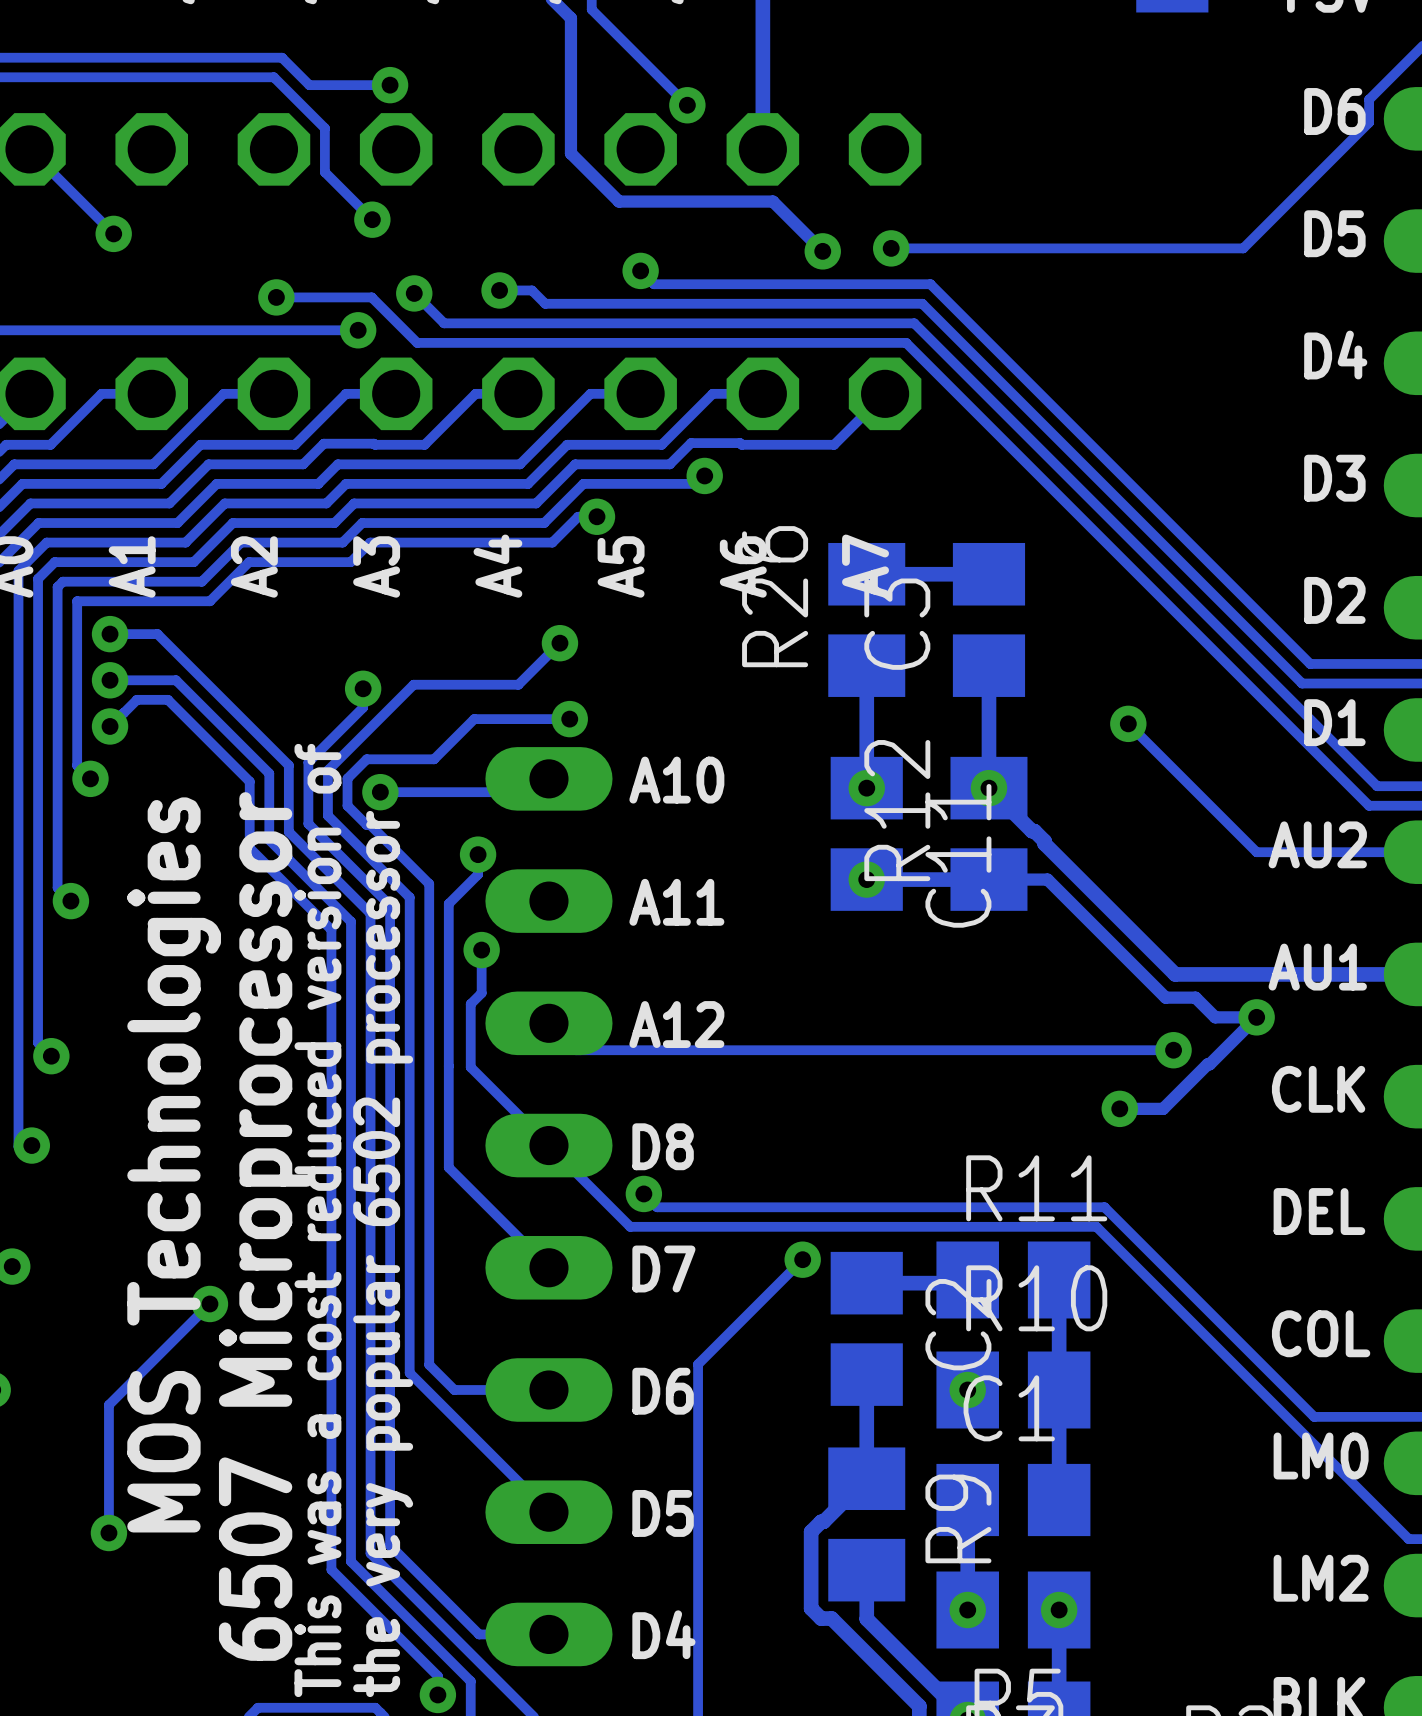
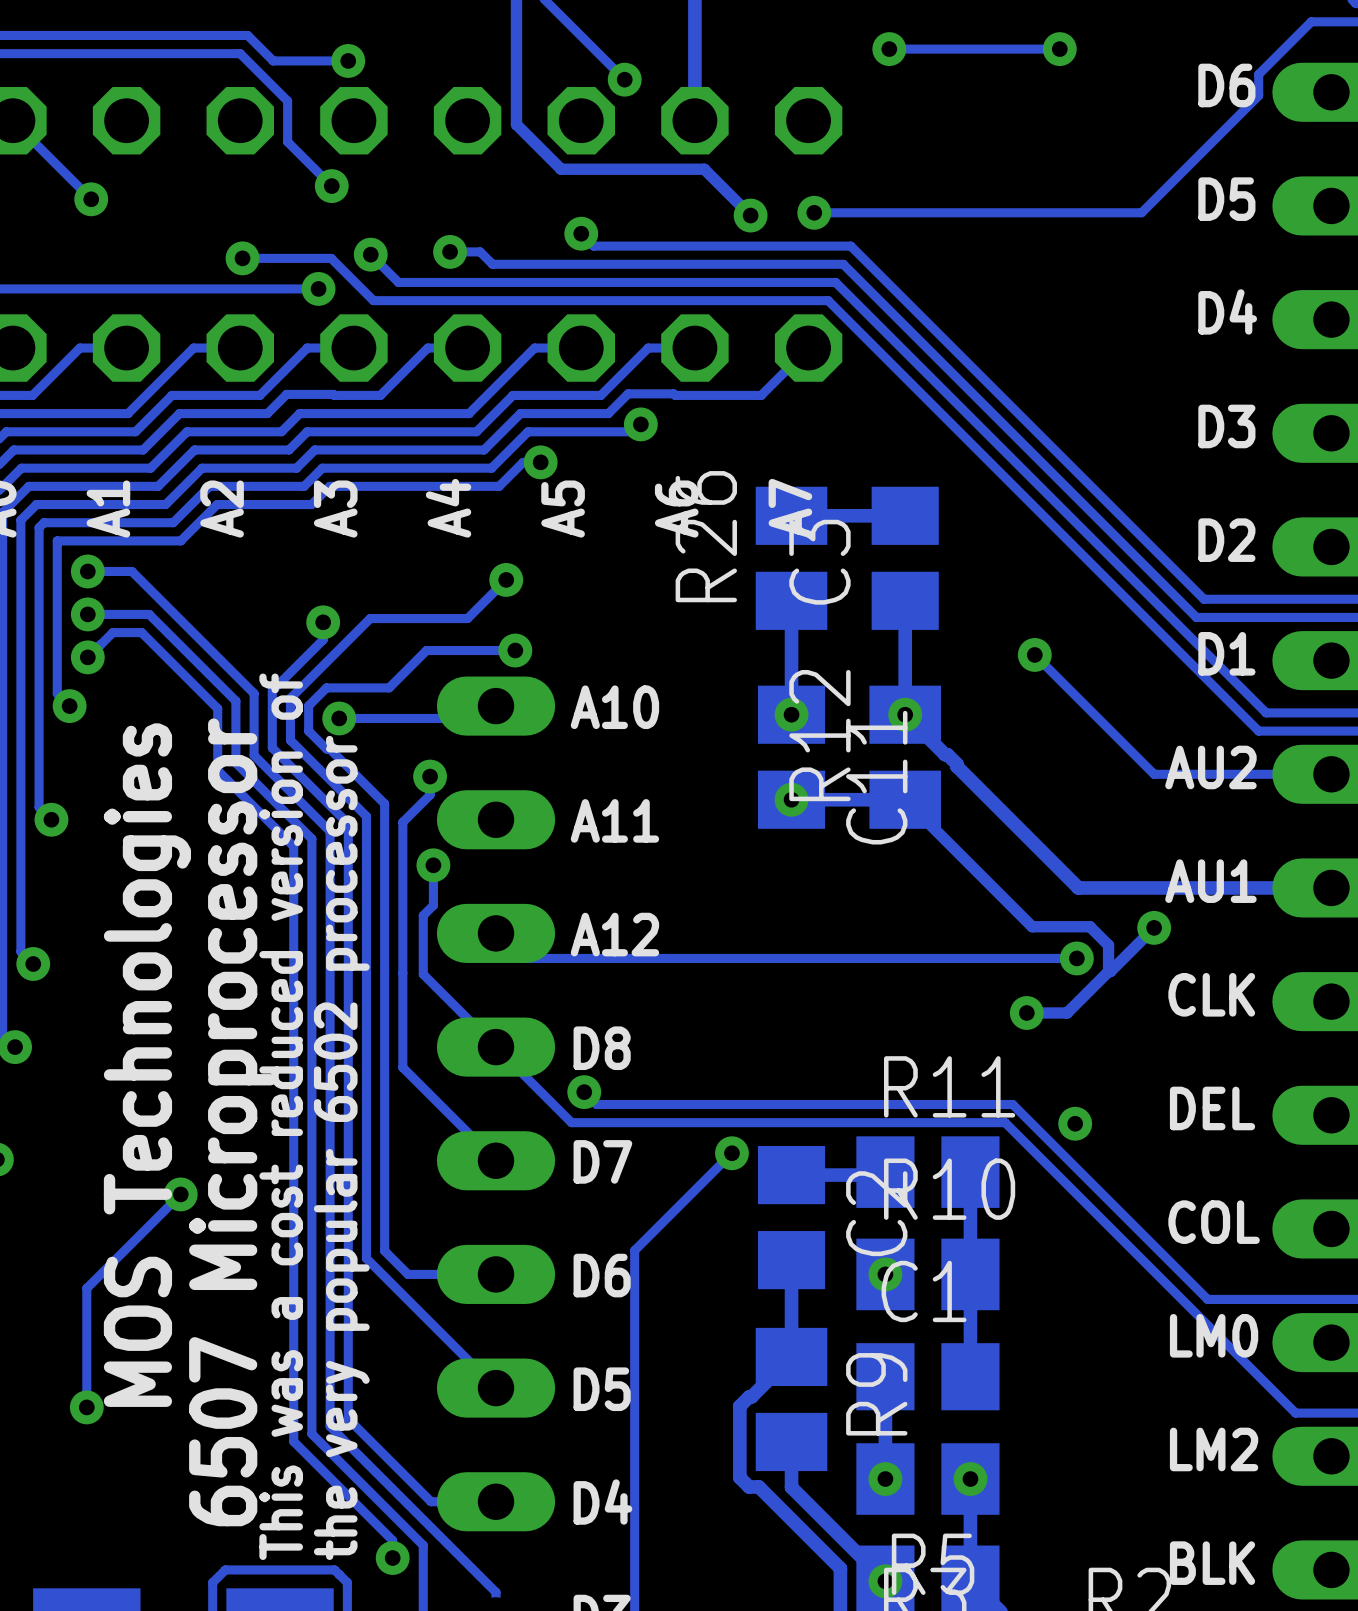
via: none -> (889, 49)
track: none -> (1059, 49) (889, 49)
via: none -> (1059, 49)
track: (988, 879) (1047, 879) (1165, 997) (1195, 997) (1215, 1017) (1256, 1017) -> (905, 799) (1032, 926) (1089, 926) (1108, 945) (1108, 971)
via: none -> (1075, 1123)

